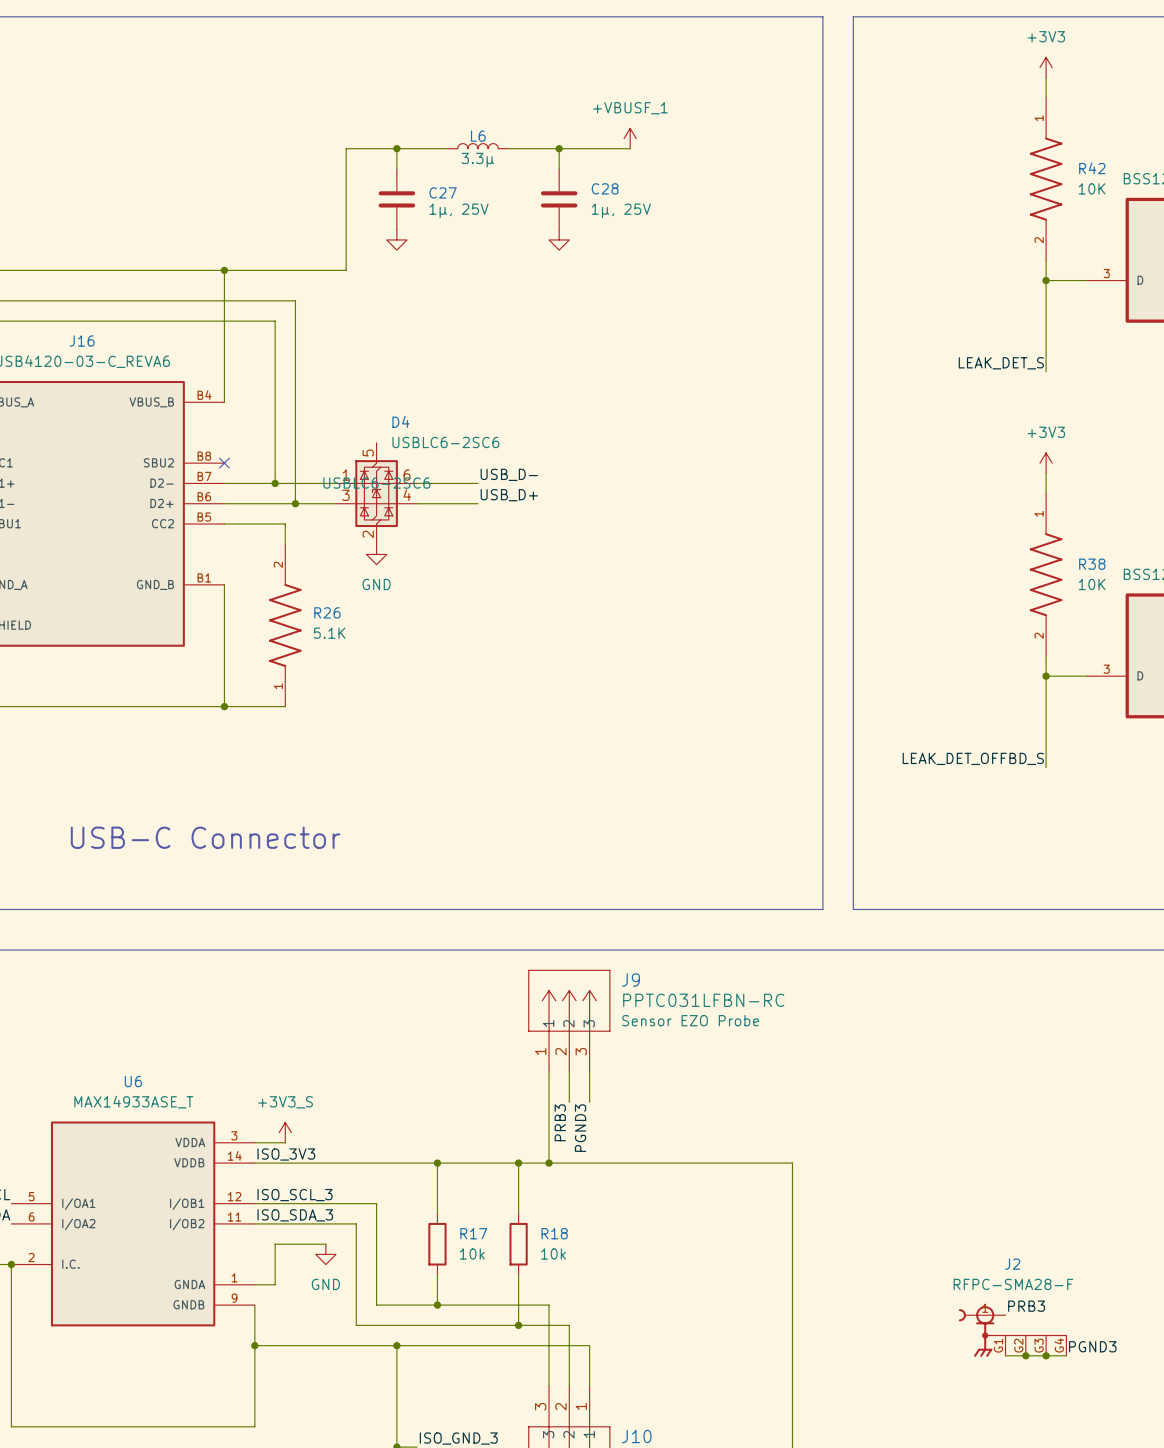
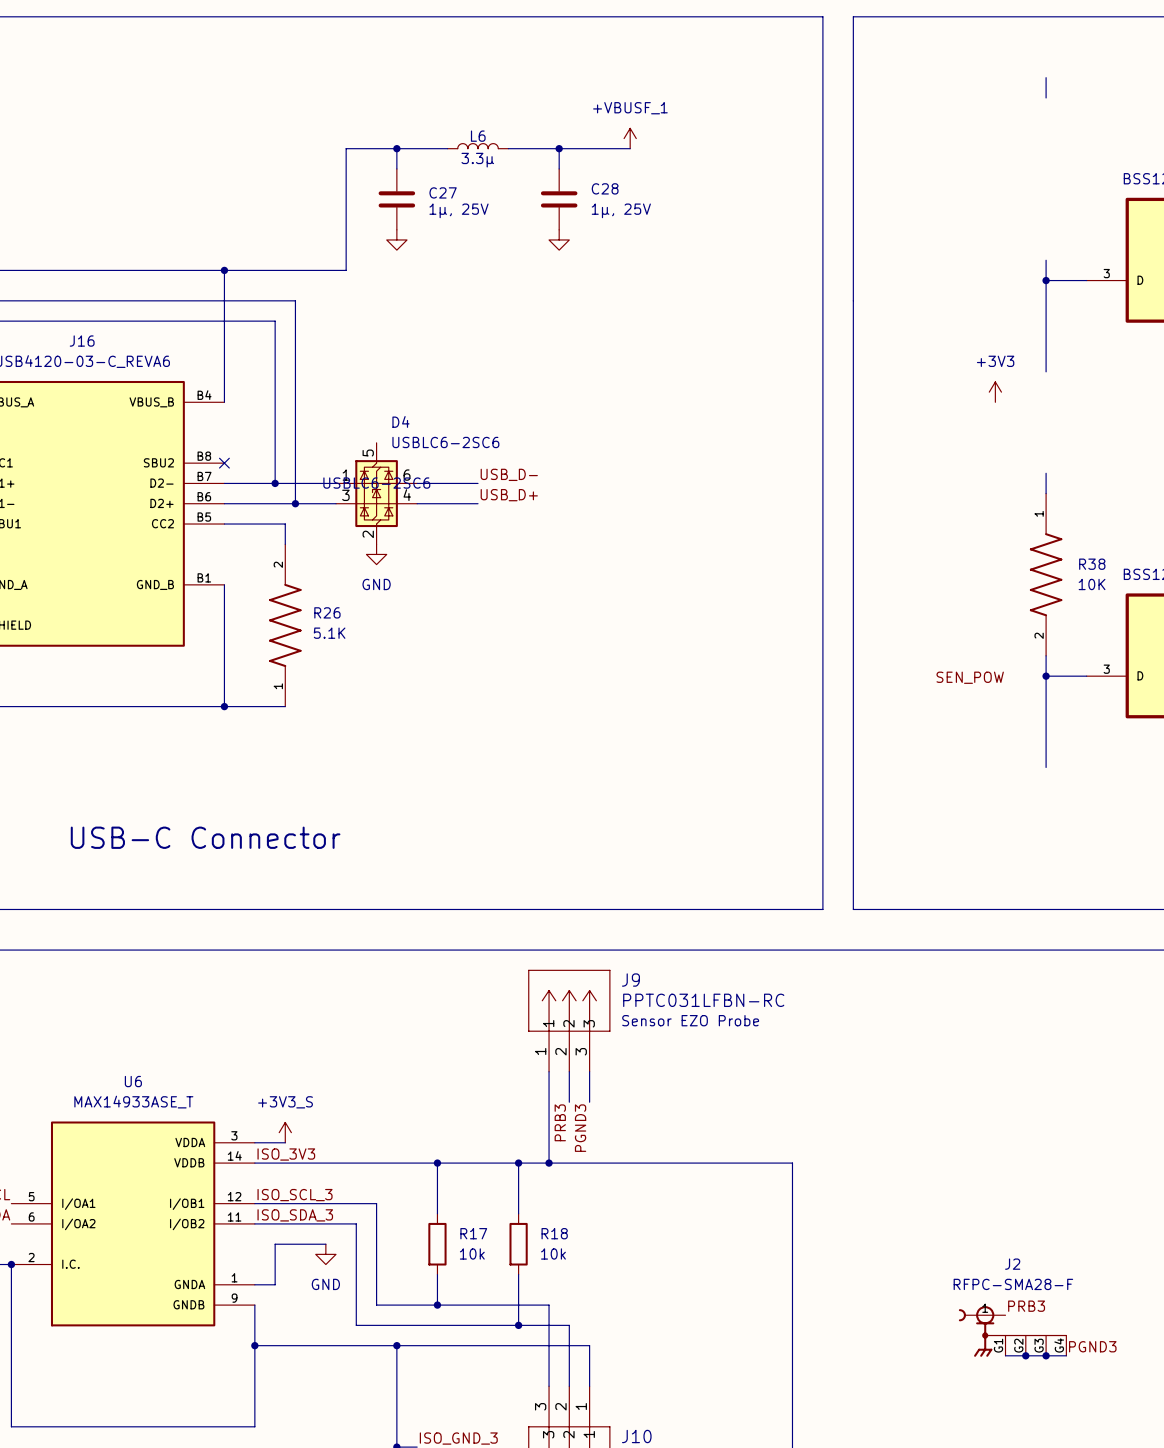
power symbol: +3V3 (1046, 67) -> none
R42: 10K (1046, 179) -> none
label: LEAK_DET_S (1001, 363) -> none
power symbol position: +3V3 (1046, 463) -> +3V3 (995, 392)
label: none -> SEN_POW (970, 677)
label: LEAK_DET_OFFBD_S (973, 758) -> none

